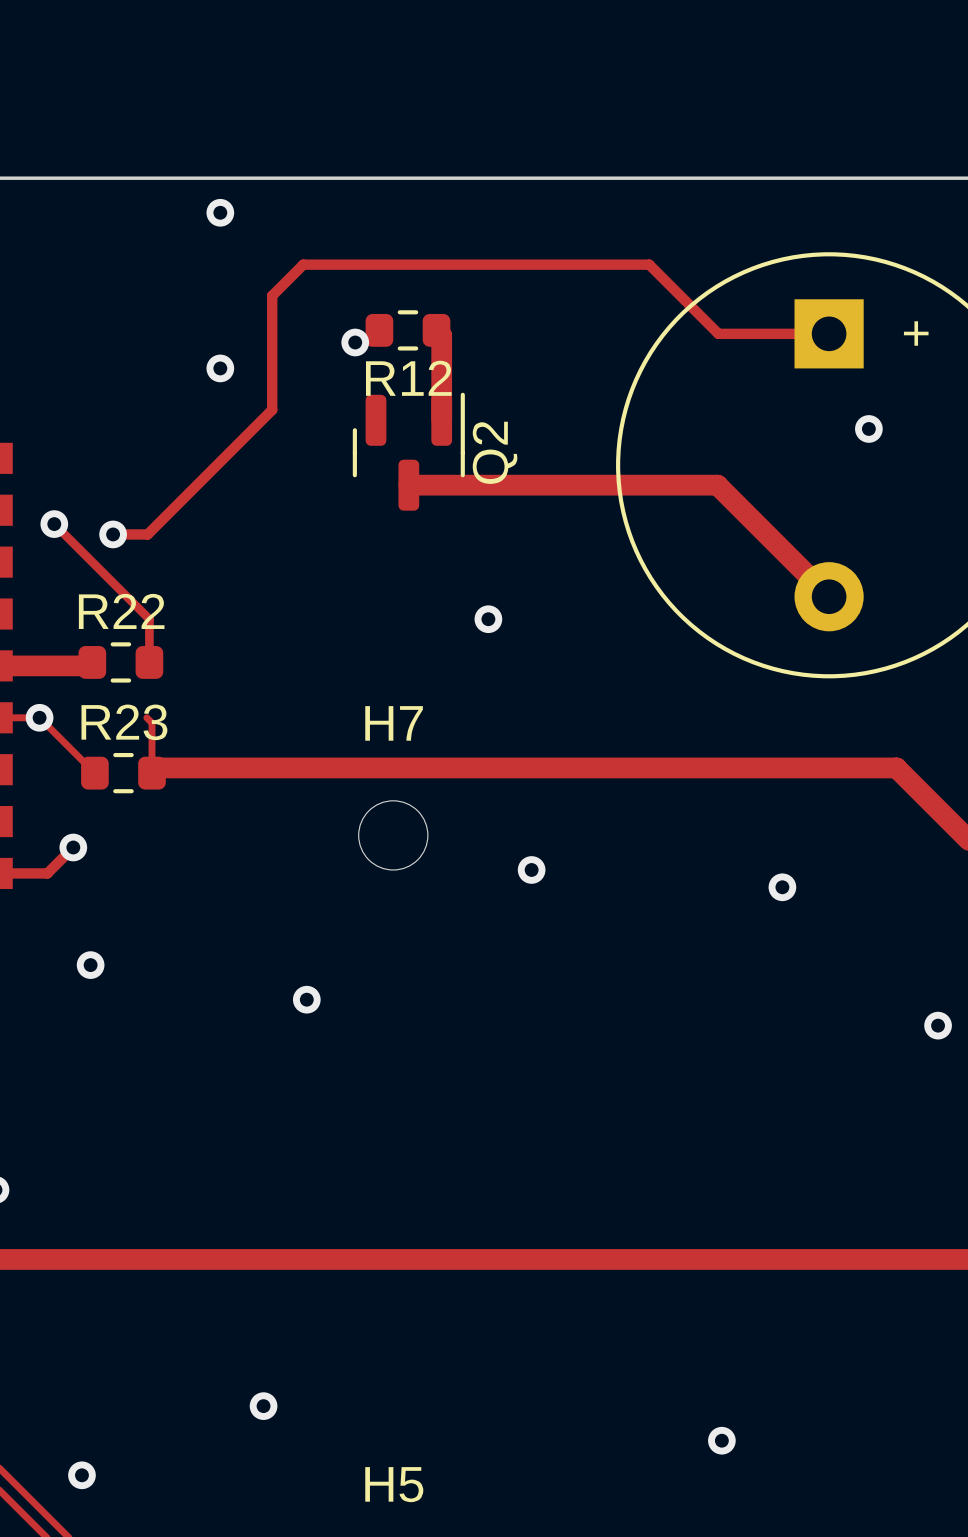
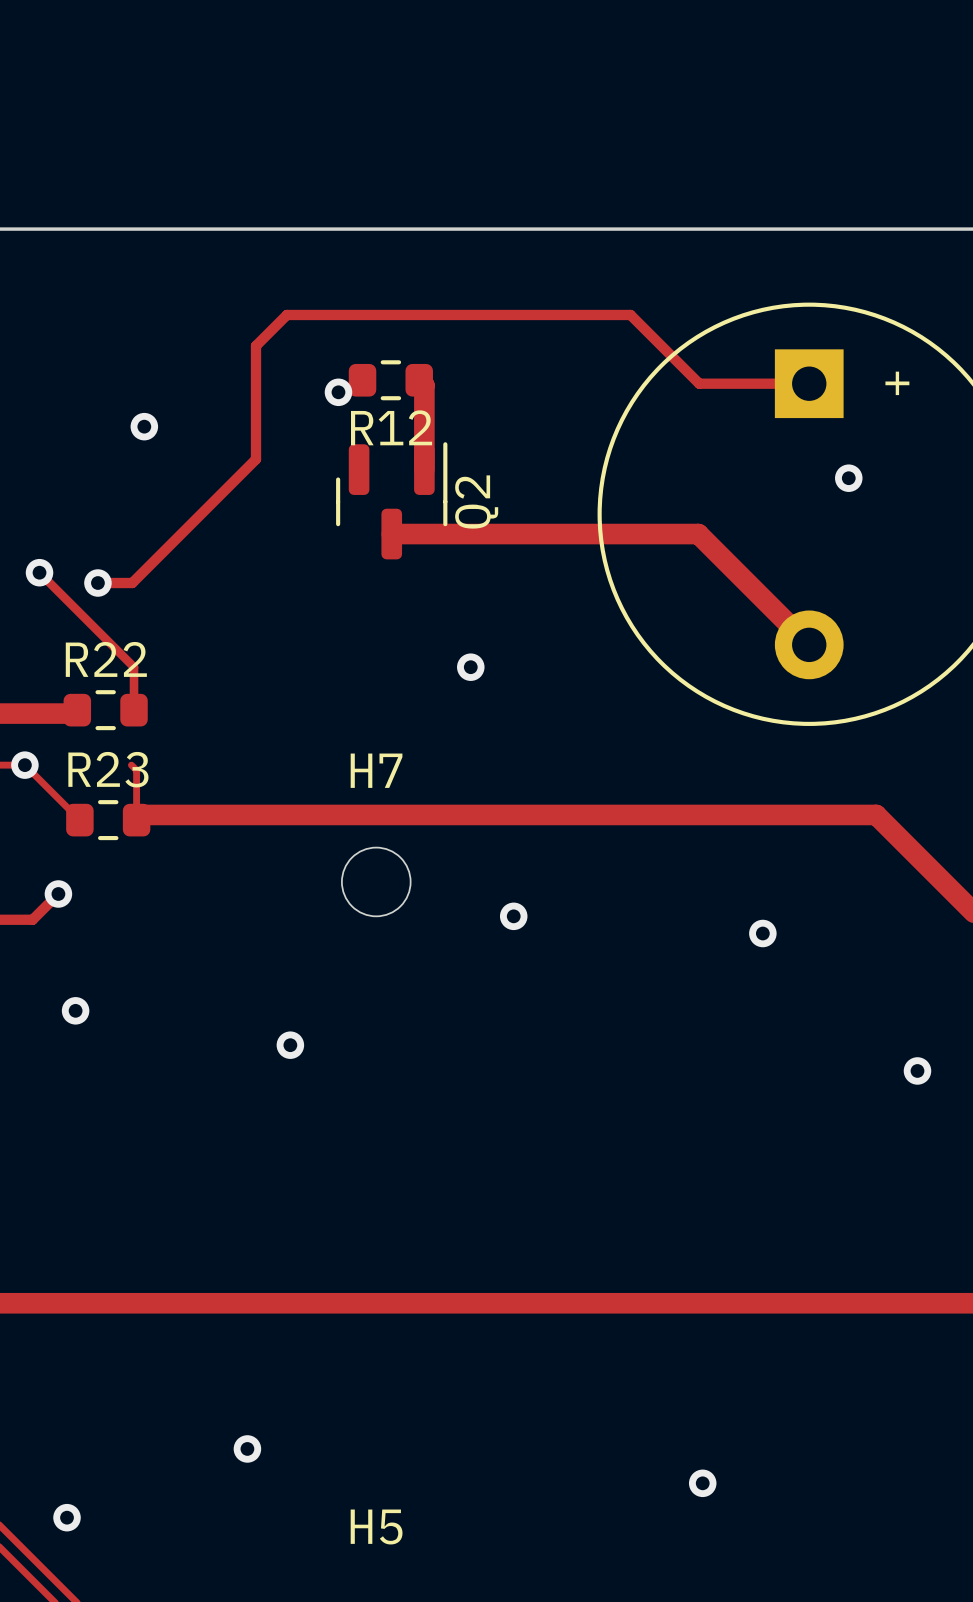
via: (220, 212) -> none
via position: (220, 368) -> (144, 426)

